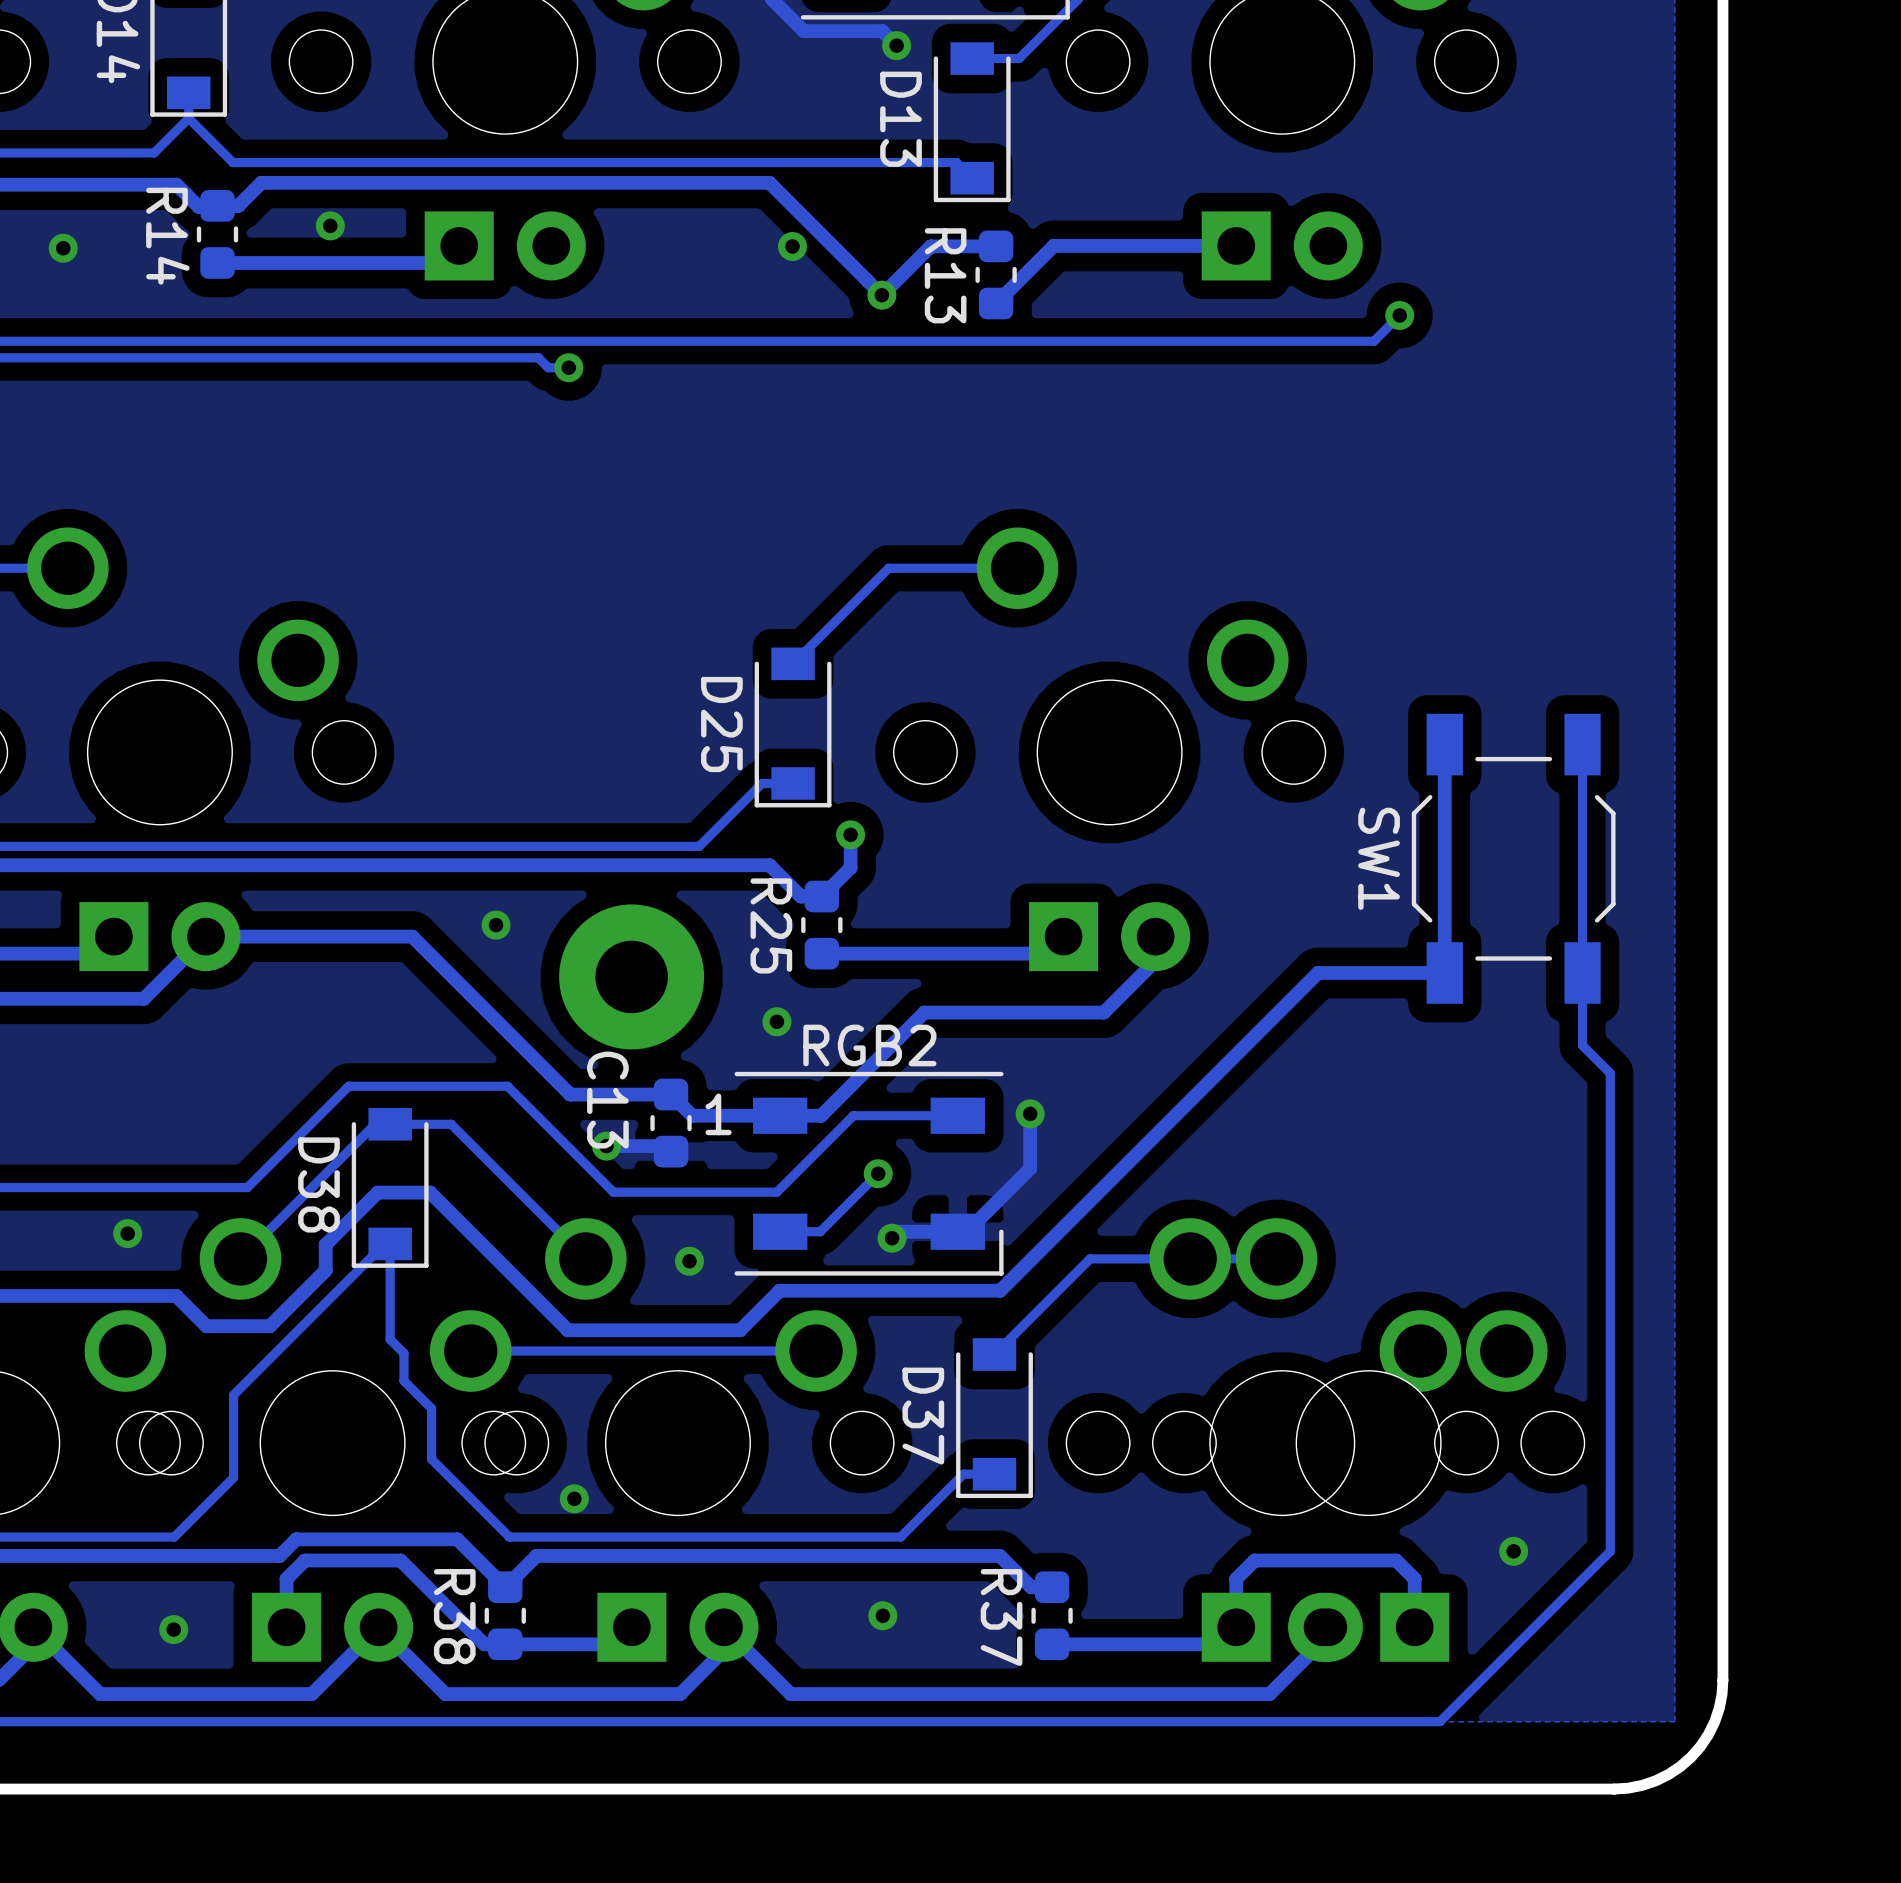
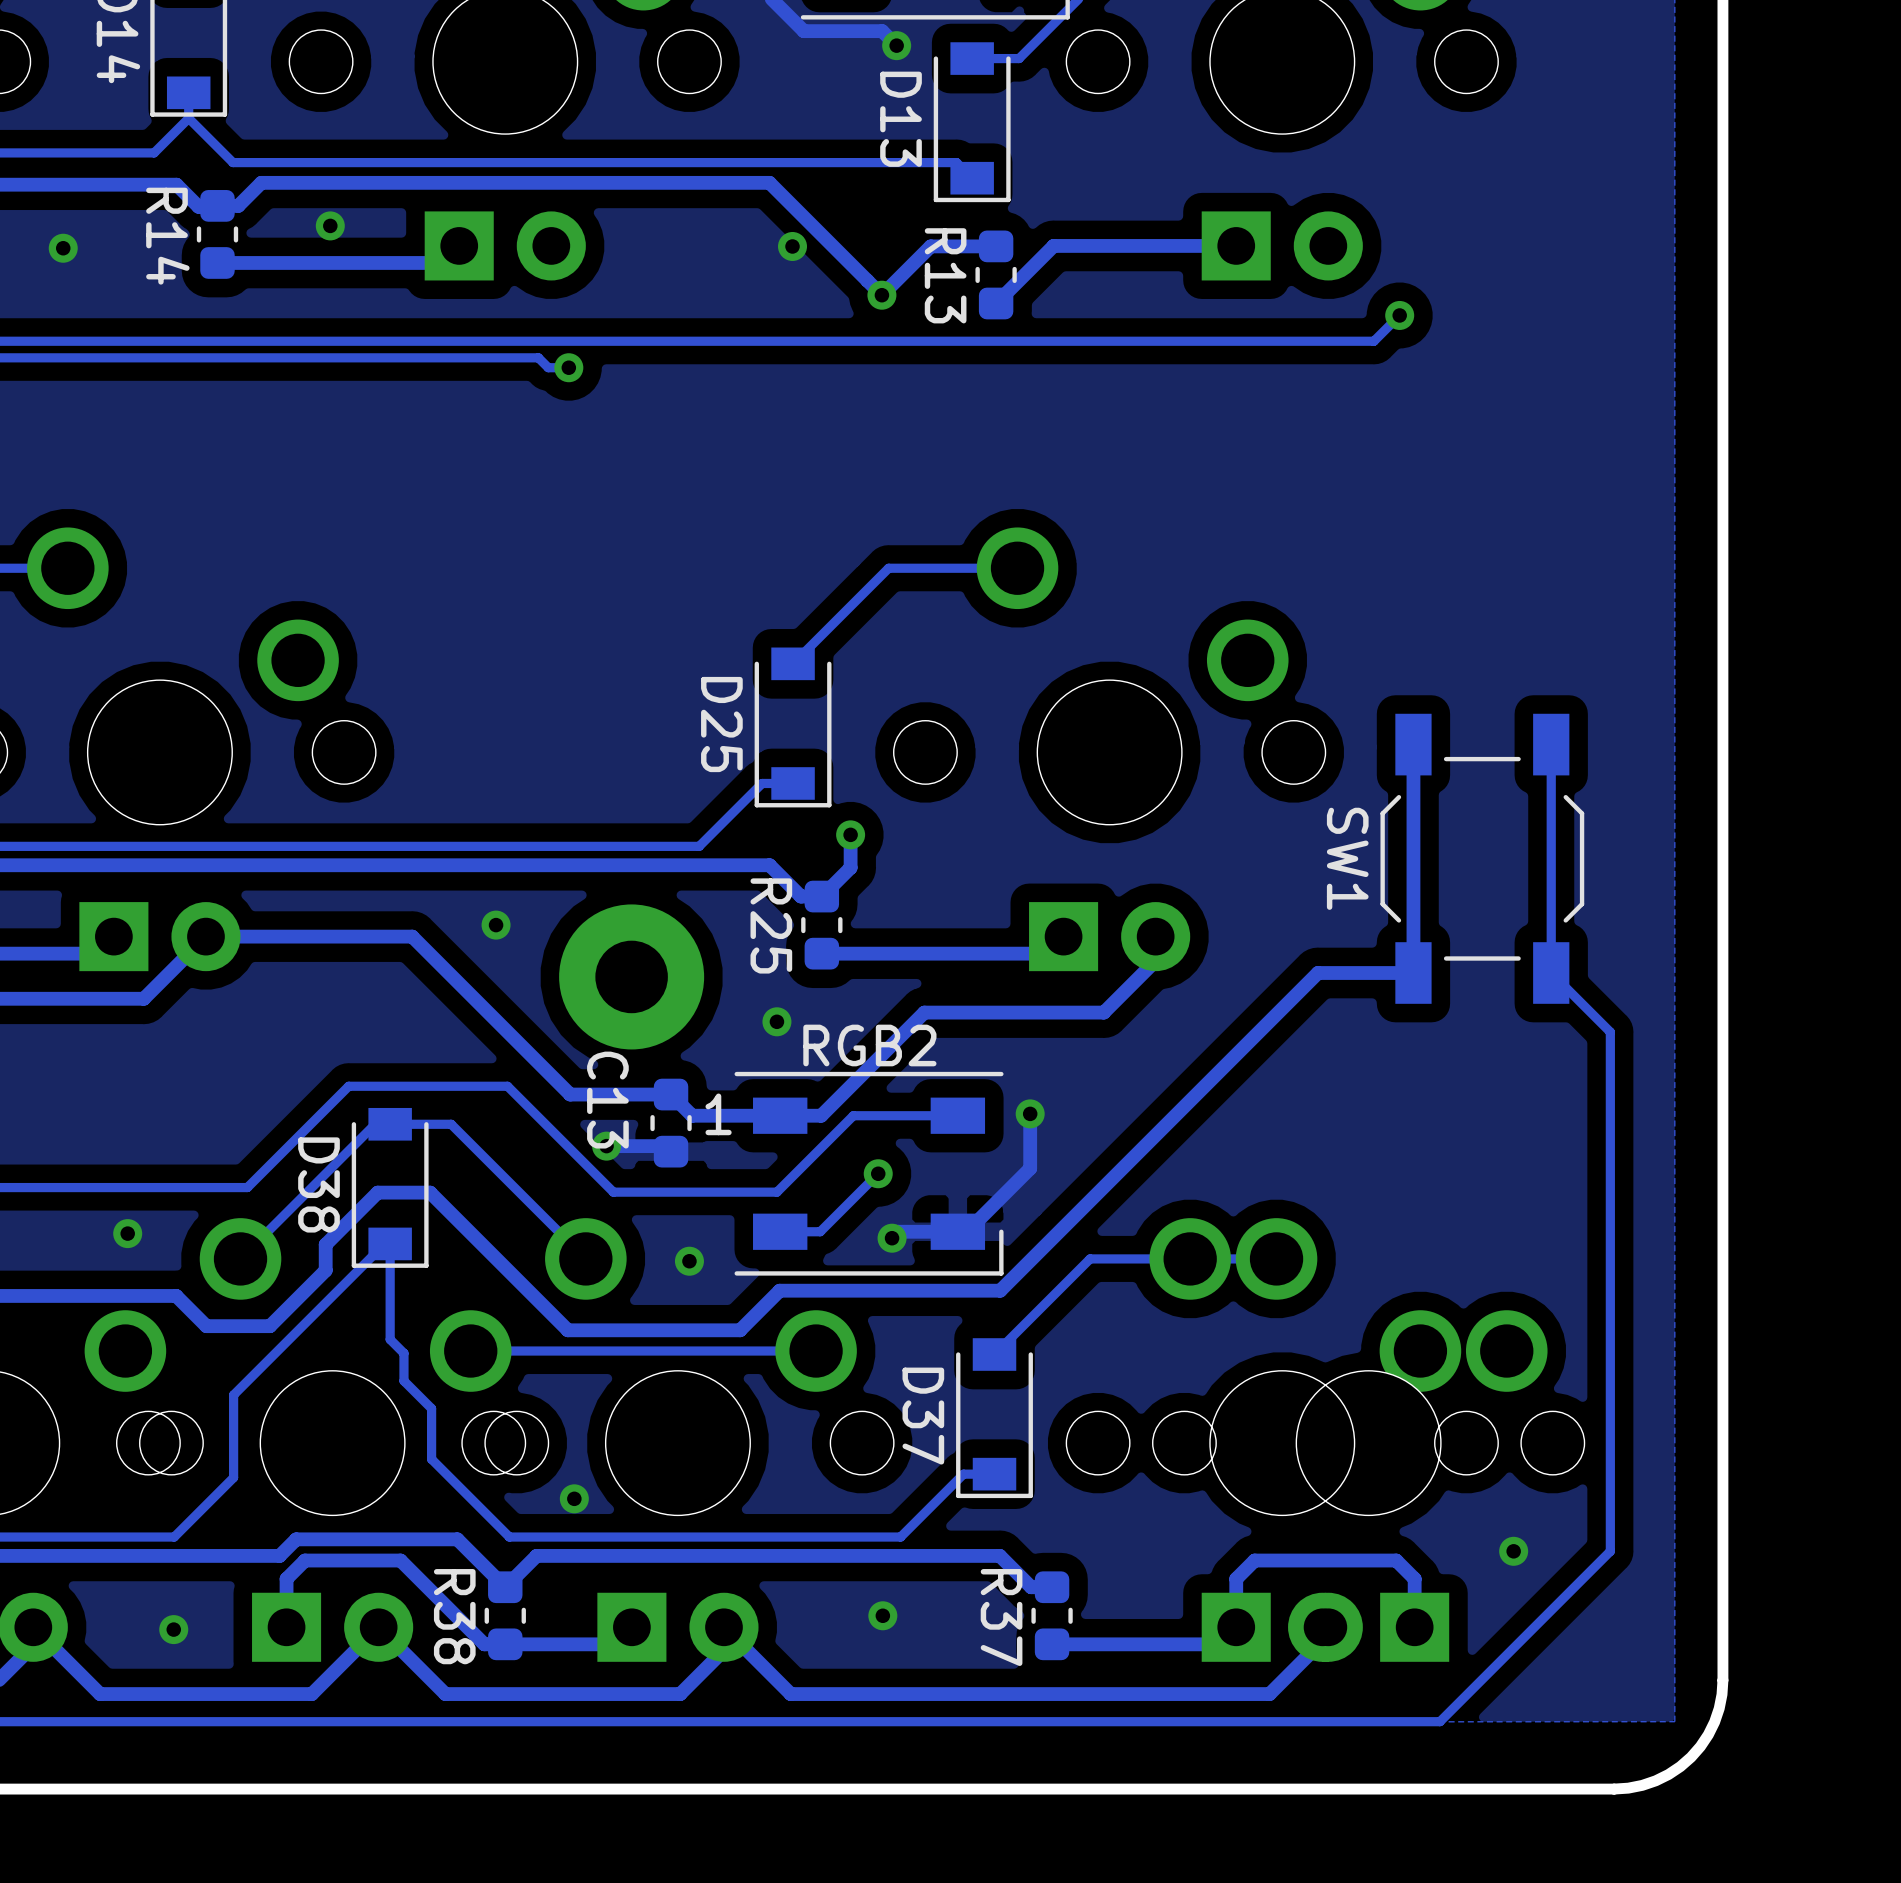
track: (1444, 744) (1444, 973) (1413, 973) -> (1413, 744) (1413, 973)
track: (1582, 744) (1582, 1045) (1610, 1073) -> (1551, 744) (1551, 973) (1610, 1032) (1610, 1073)
SW1 position: (1513, 858) -> (1482, 858)

